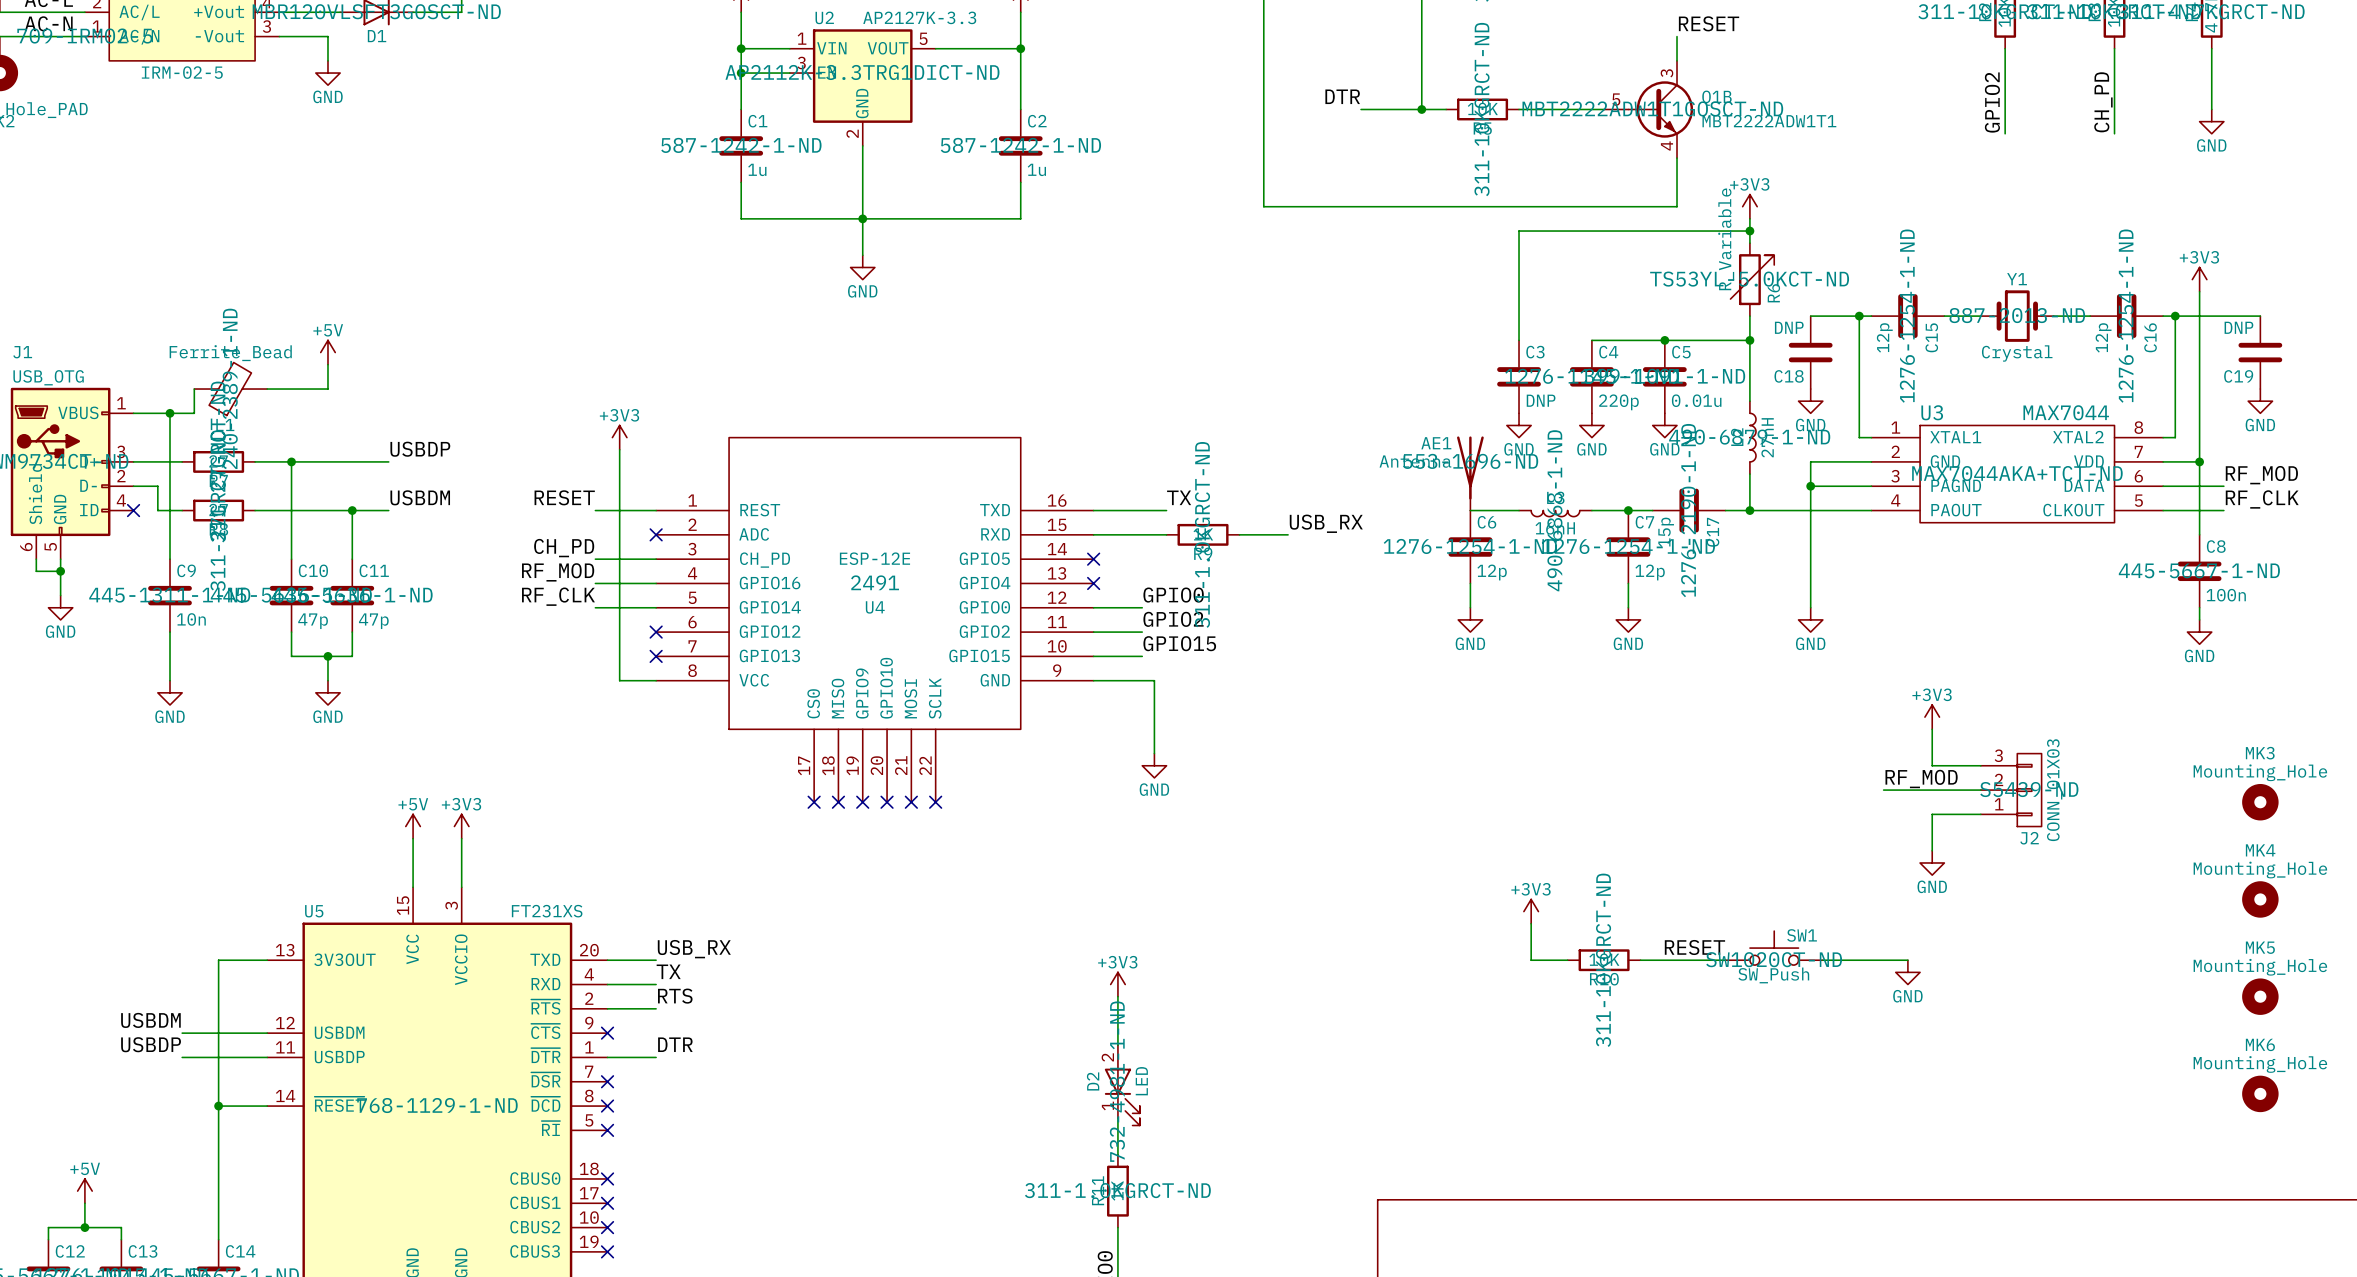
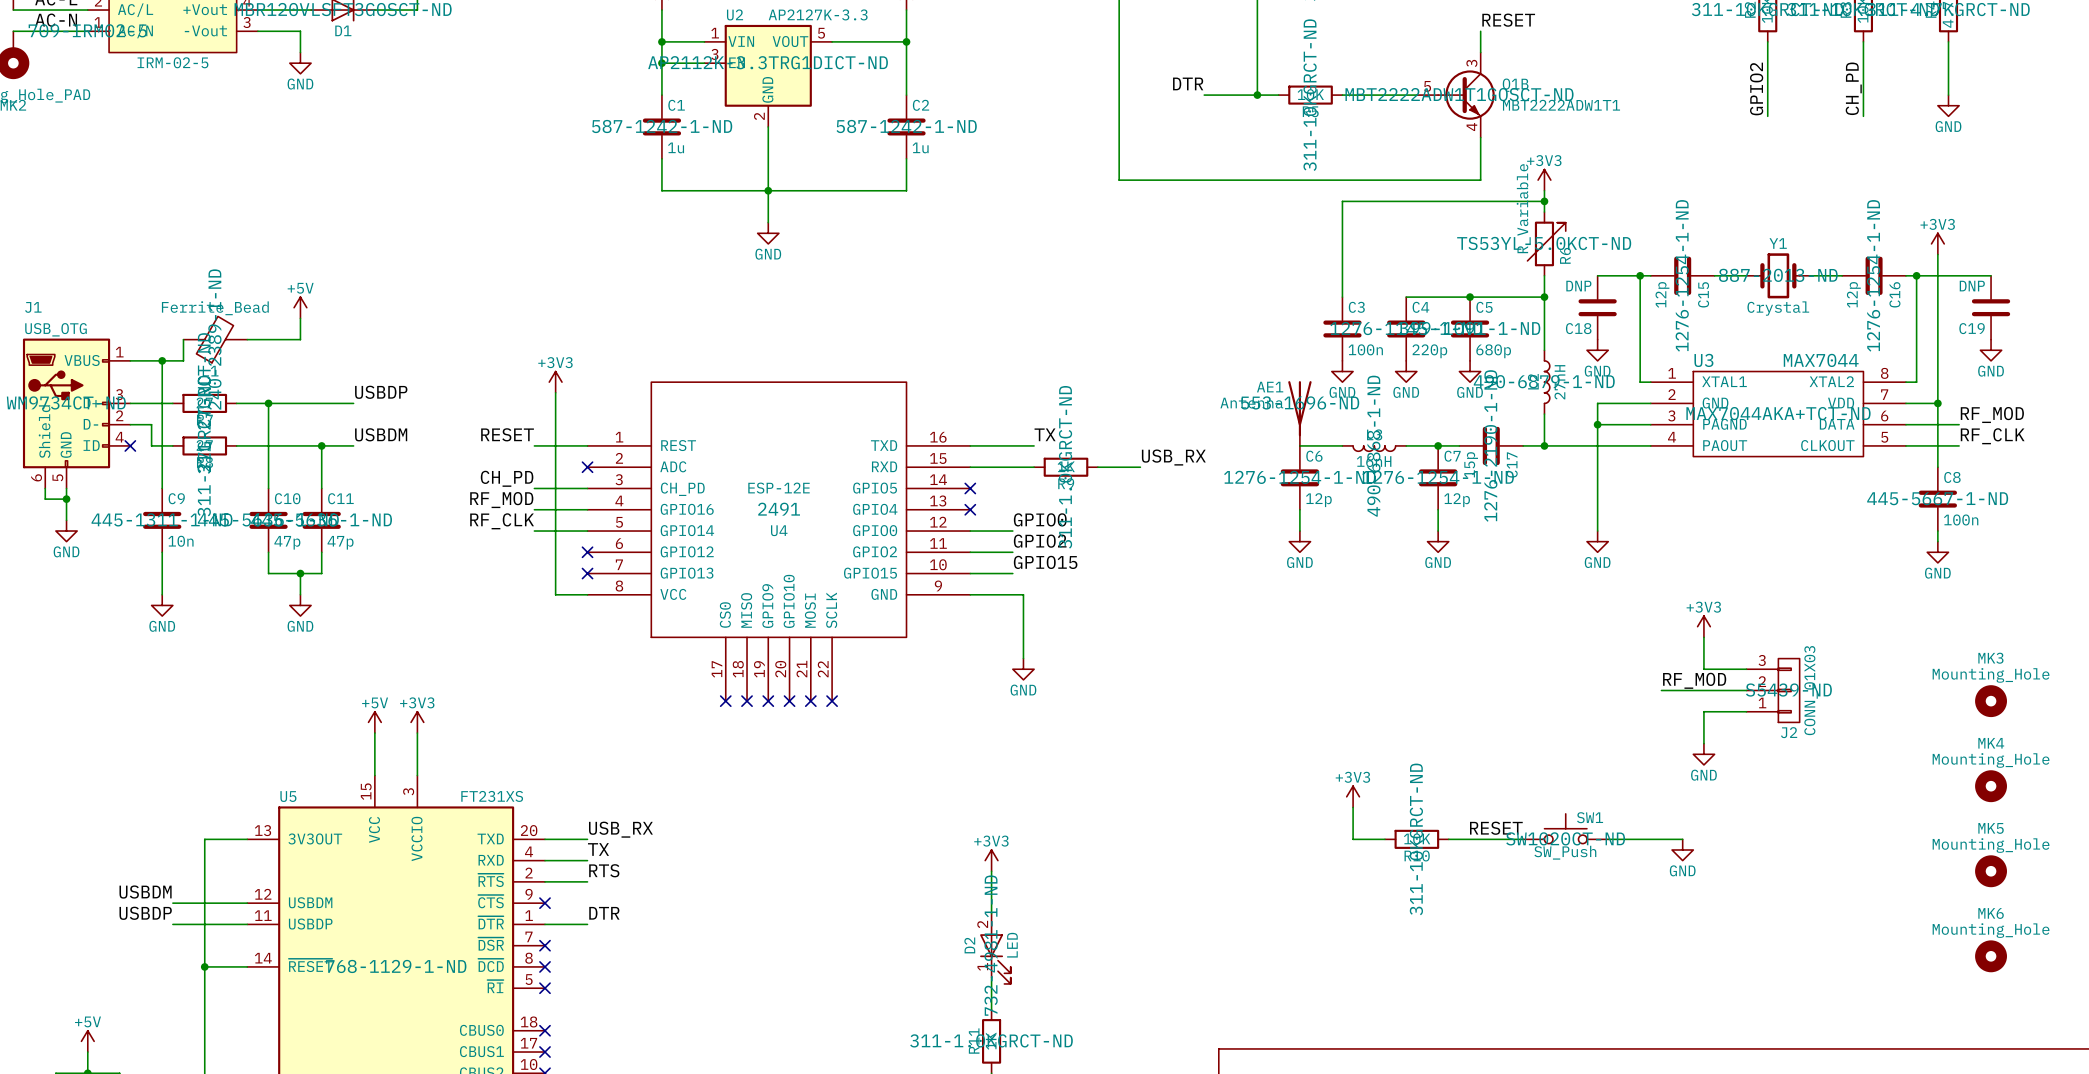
C3 value: DNP (1541, 400) -> 100n (1365, 349)
C5 value: 0.01u (1696, 400) -> 680p (1493, 351)

